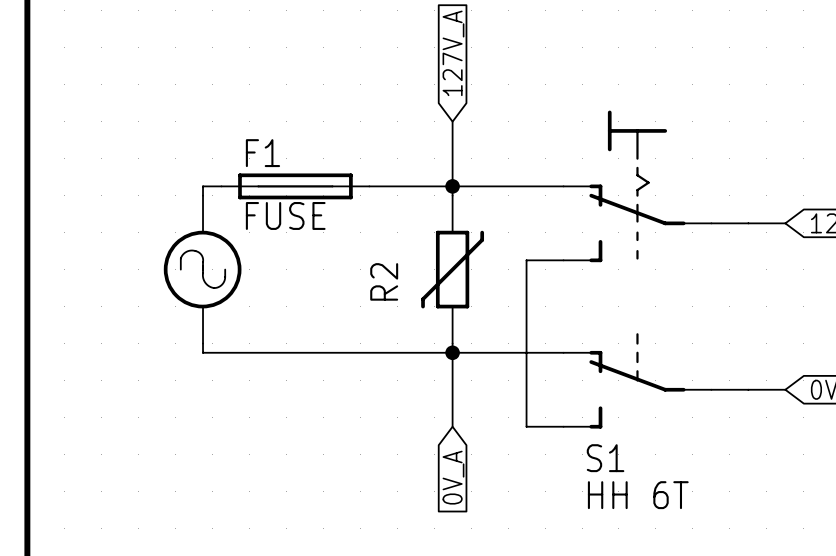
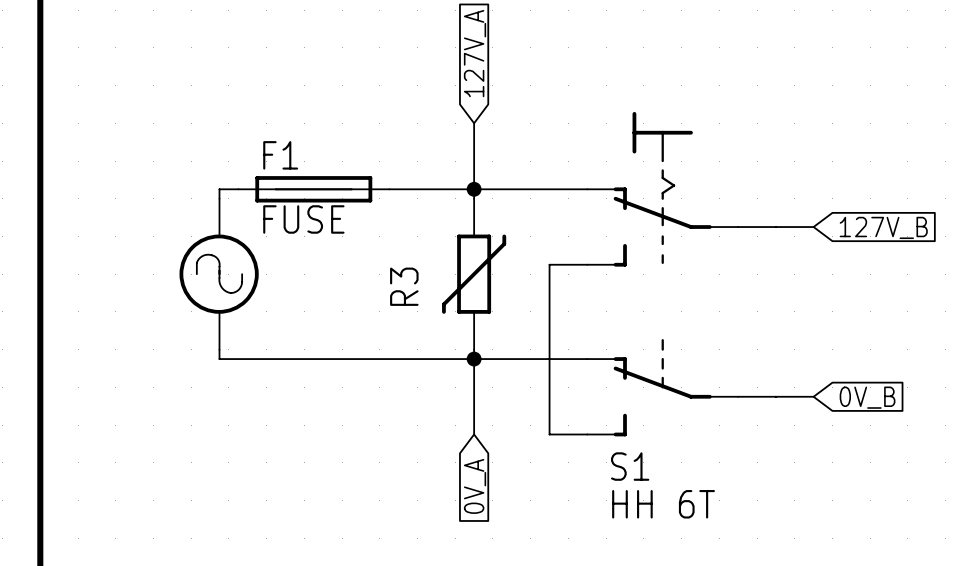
R2 name: R2 (384, 281) -> R3 (404, 286)

